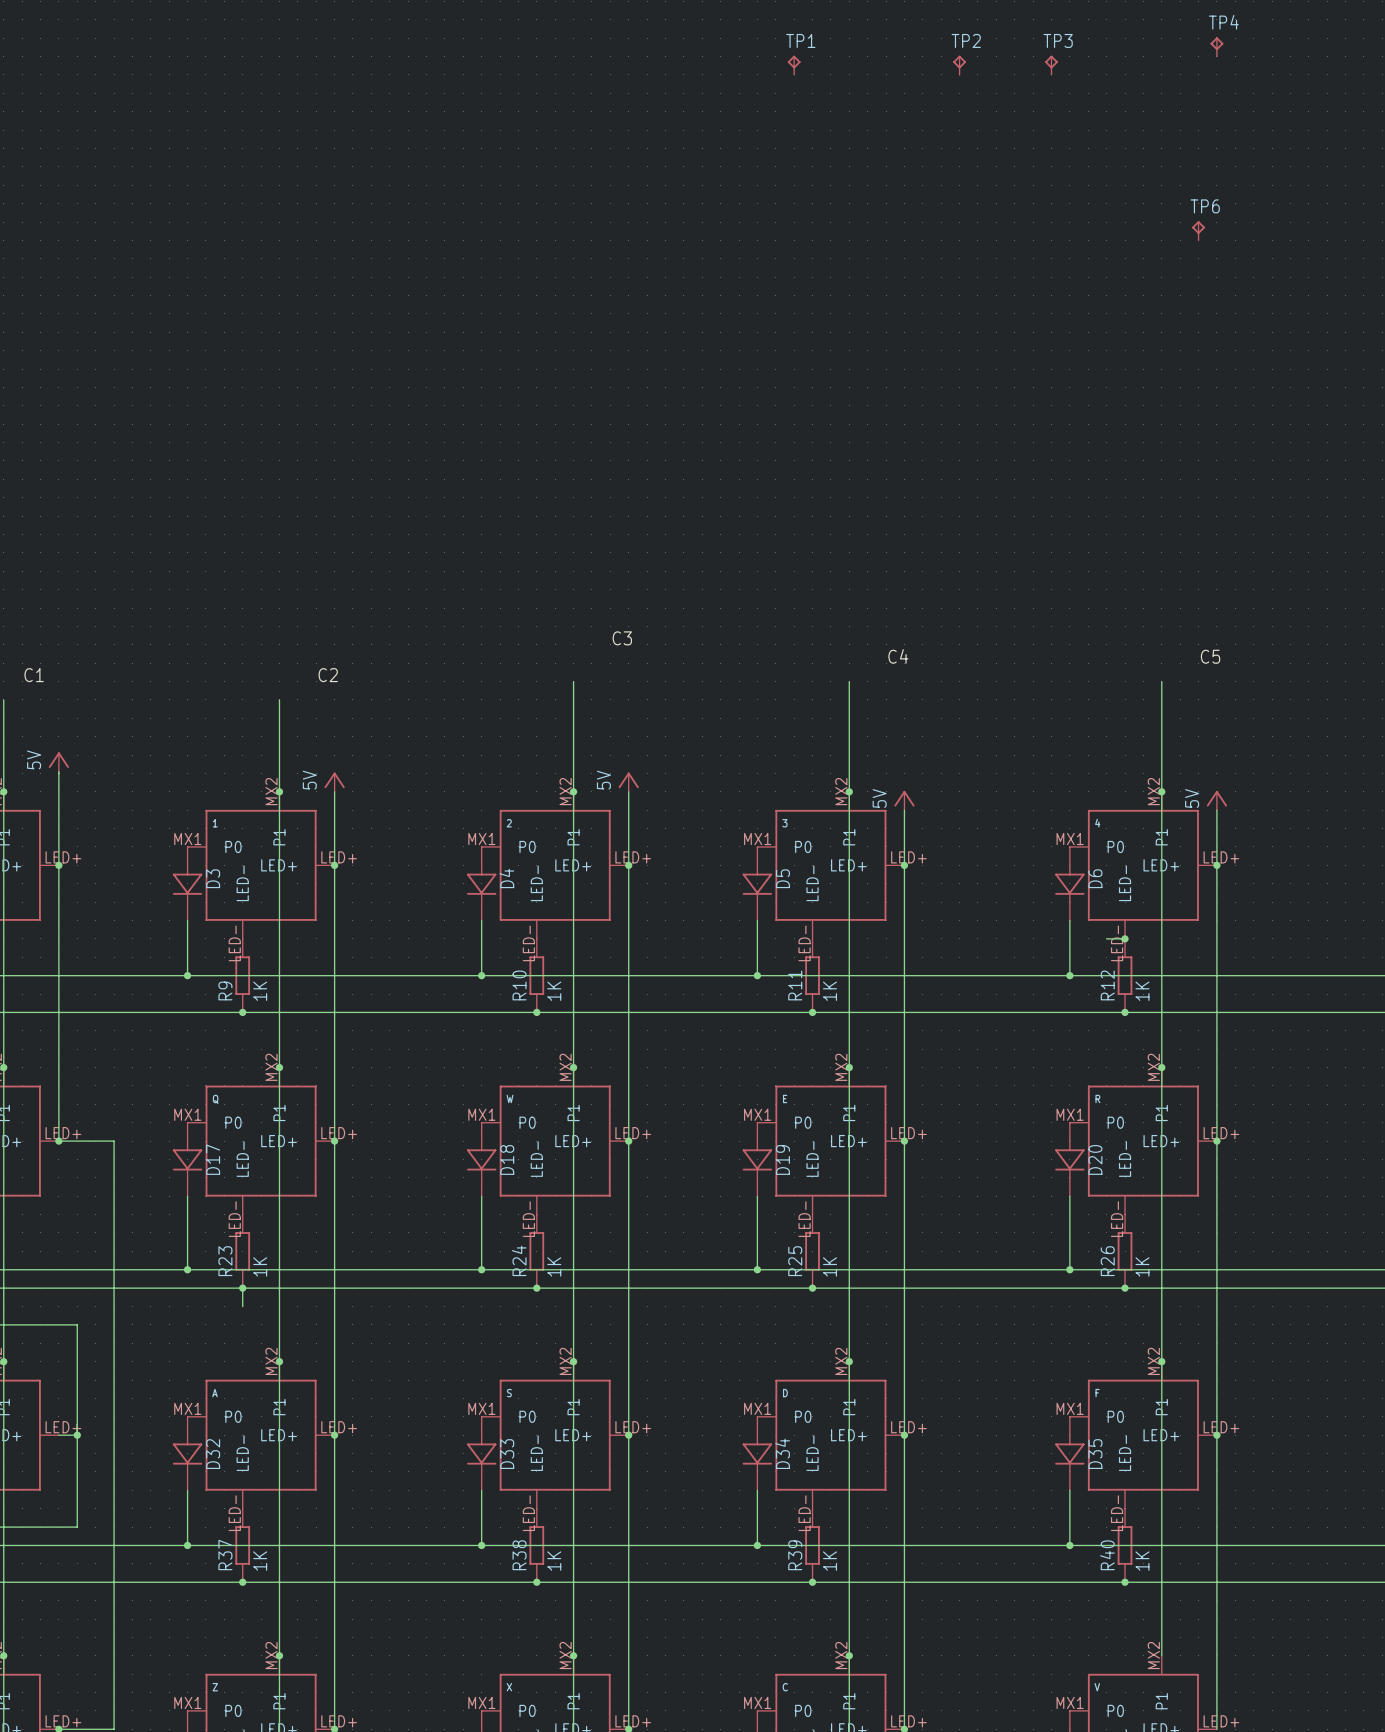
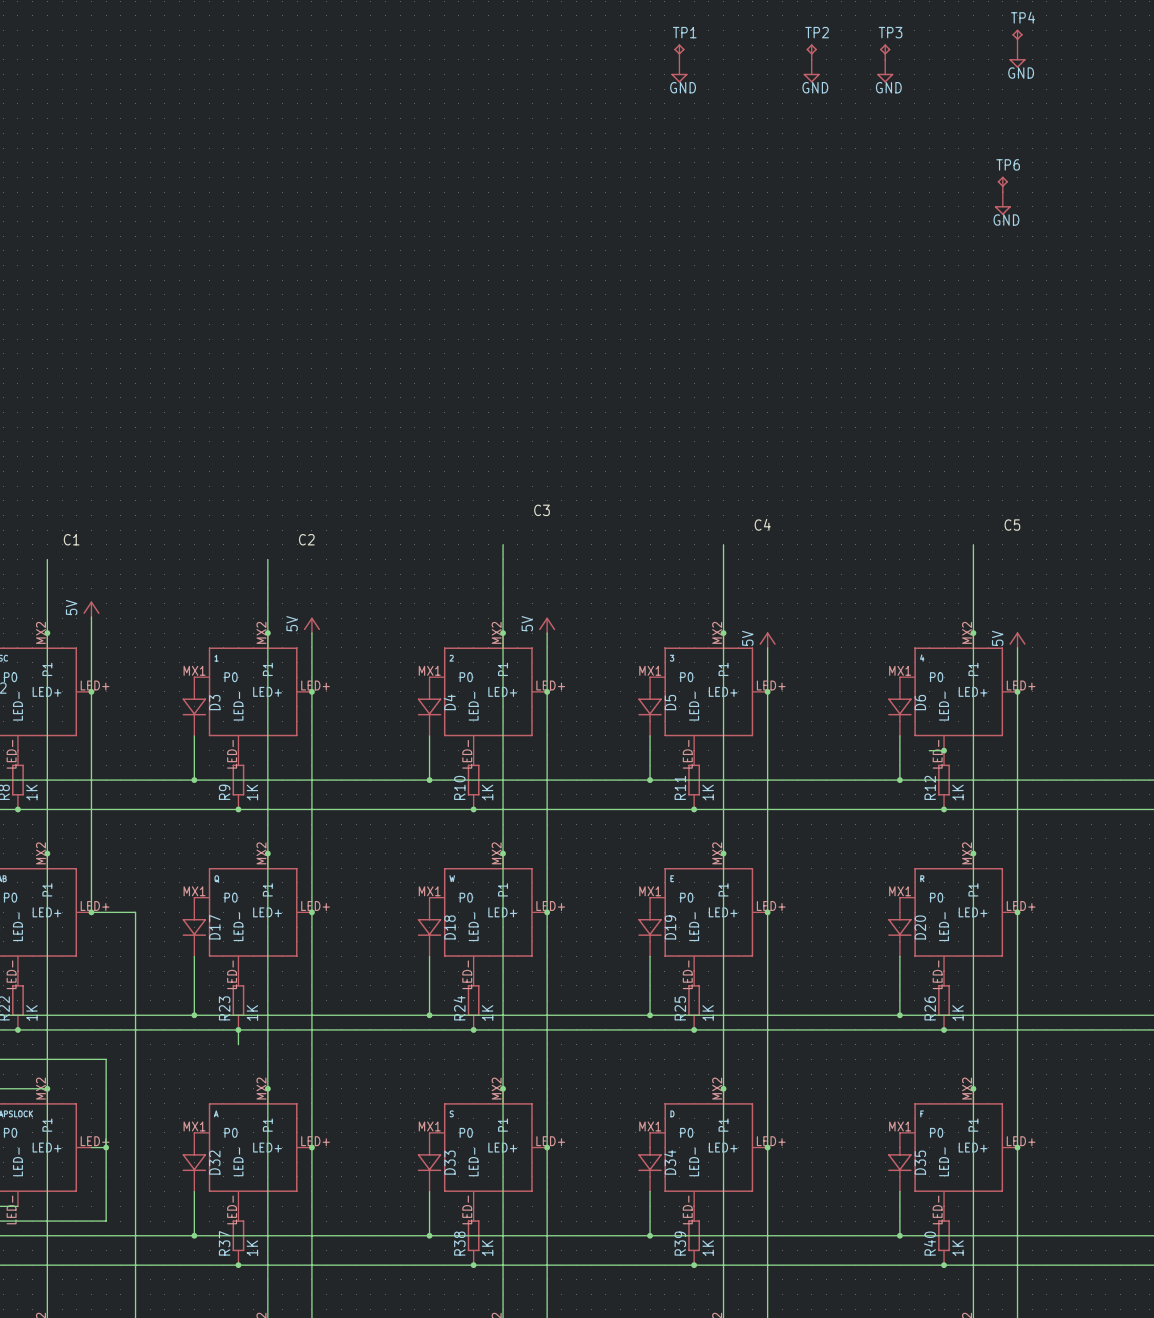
power symbol: none -> GND (1017, 56)
power symbol: none -> GND (679, 71)
power symbol: none -> GND (811, 71)
power symbol: none -> GND (885, 71)
power symbol: none -> GND (1002, 203)

